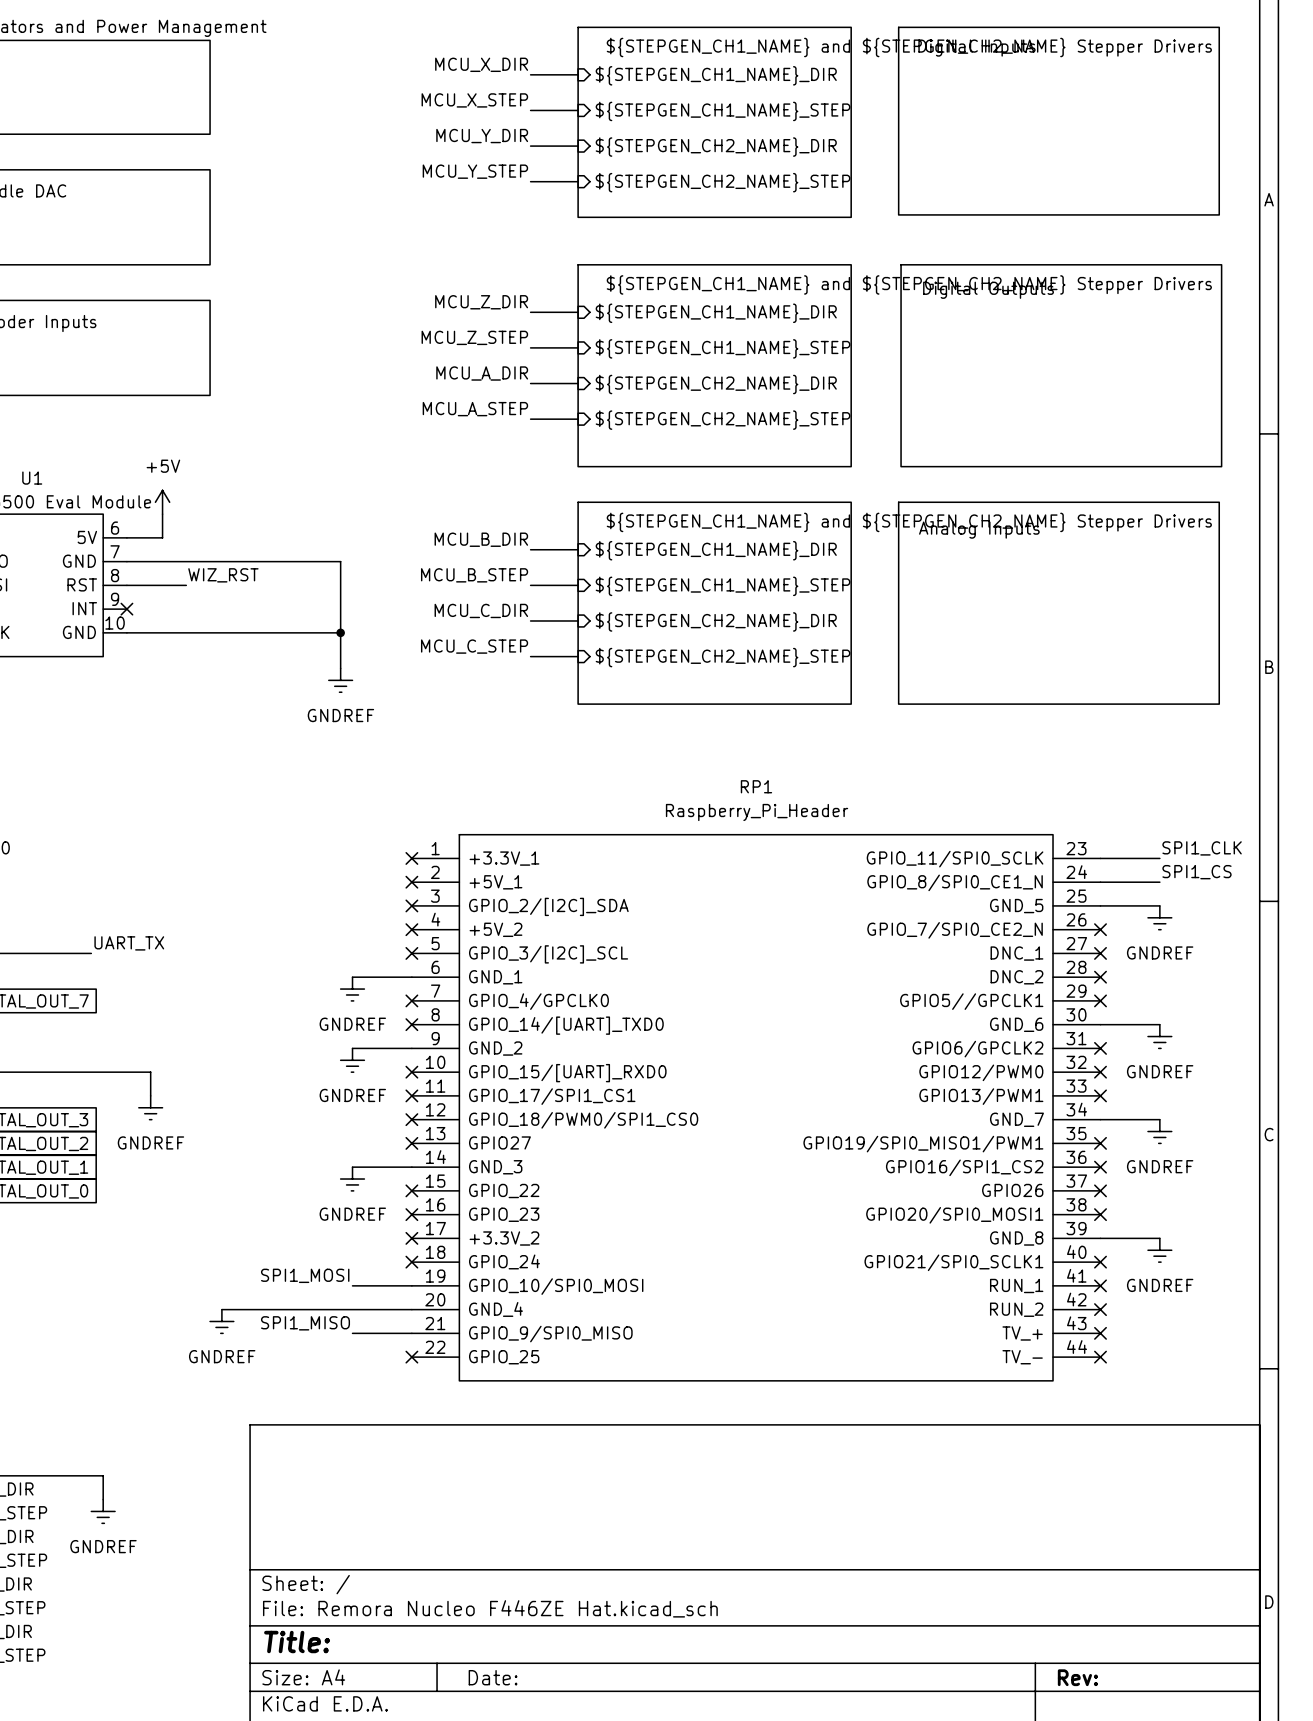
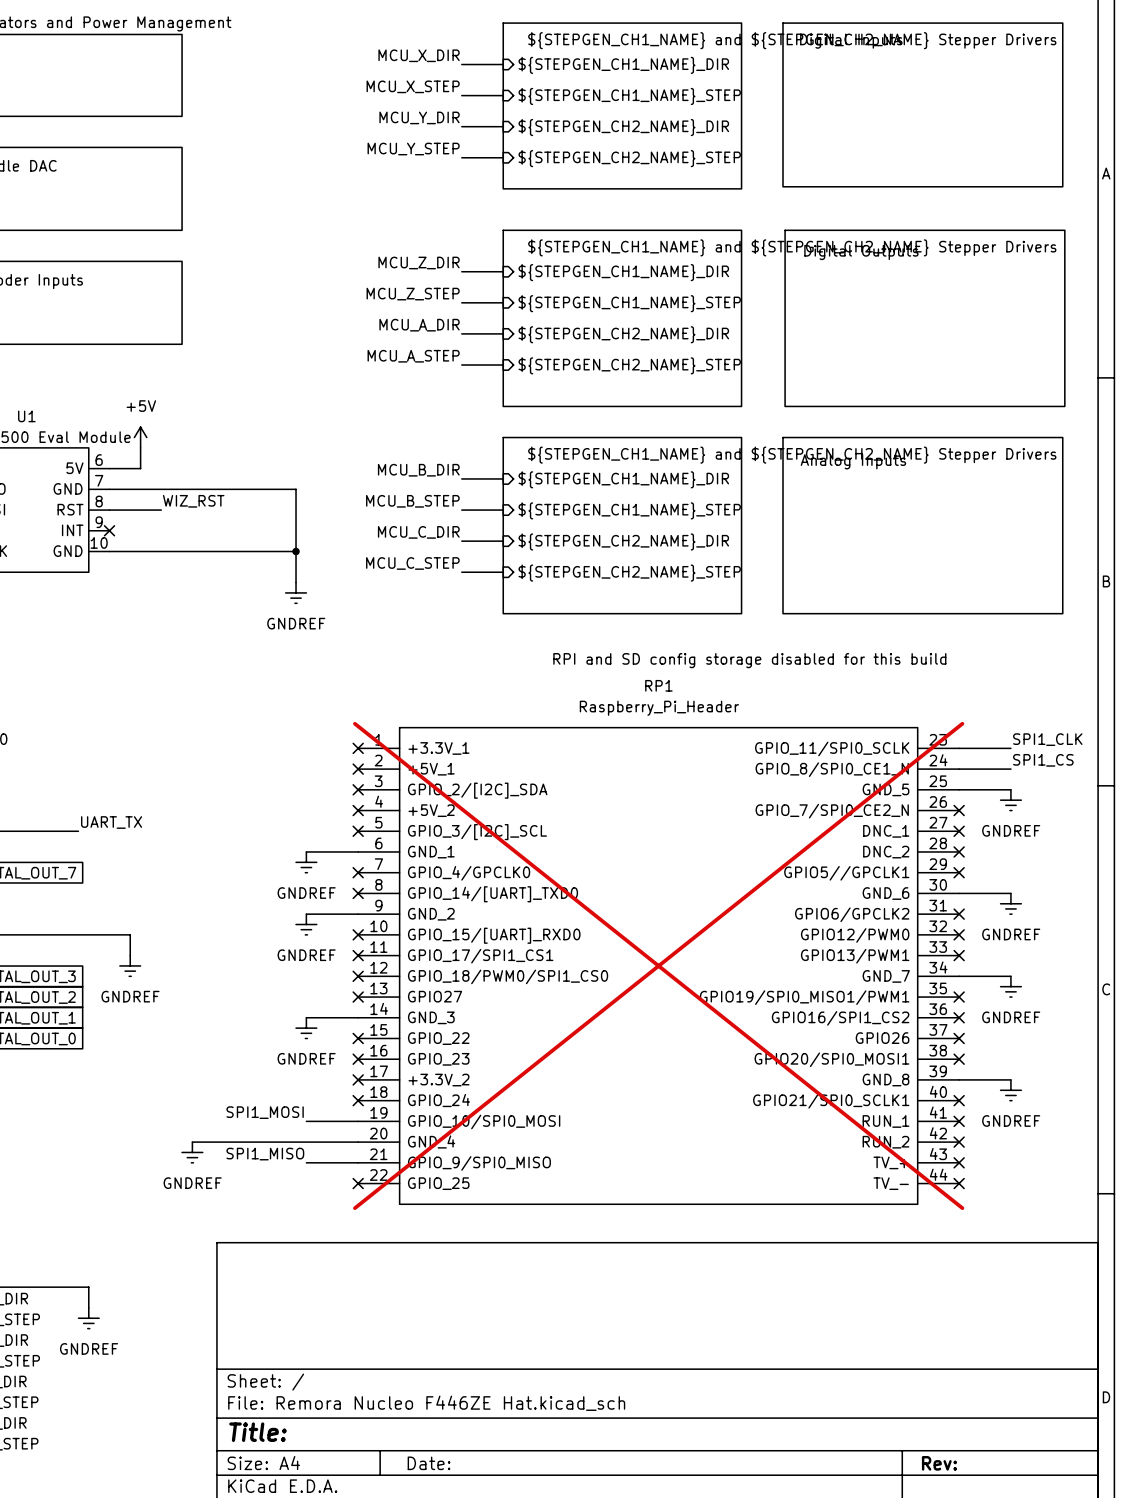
text: none -> RPI and SD config storage disabled for this build (749, 660)
RP1 do-not-place cross: none -> (658, 965)

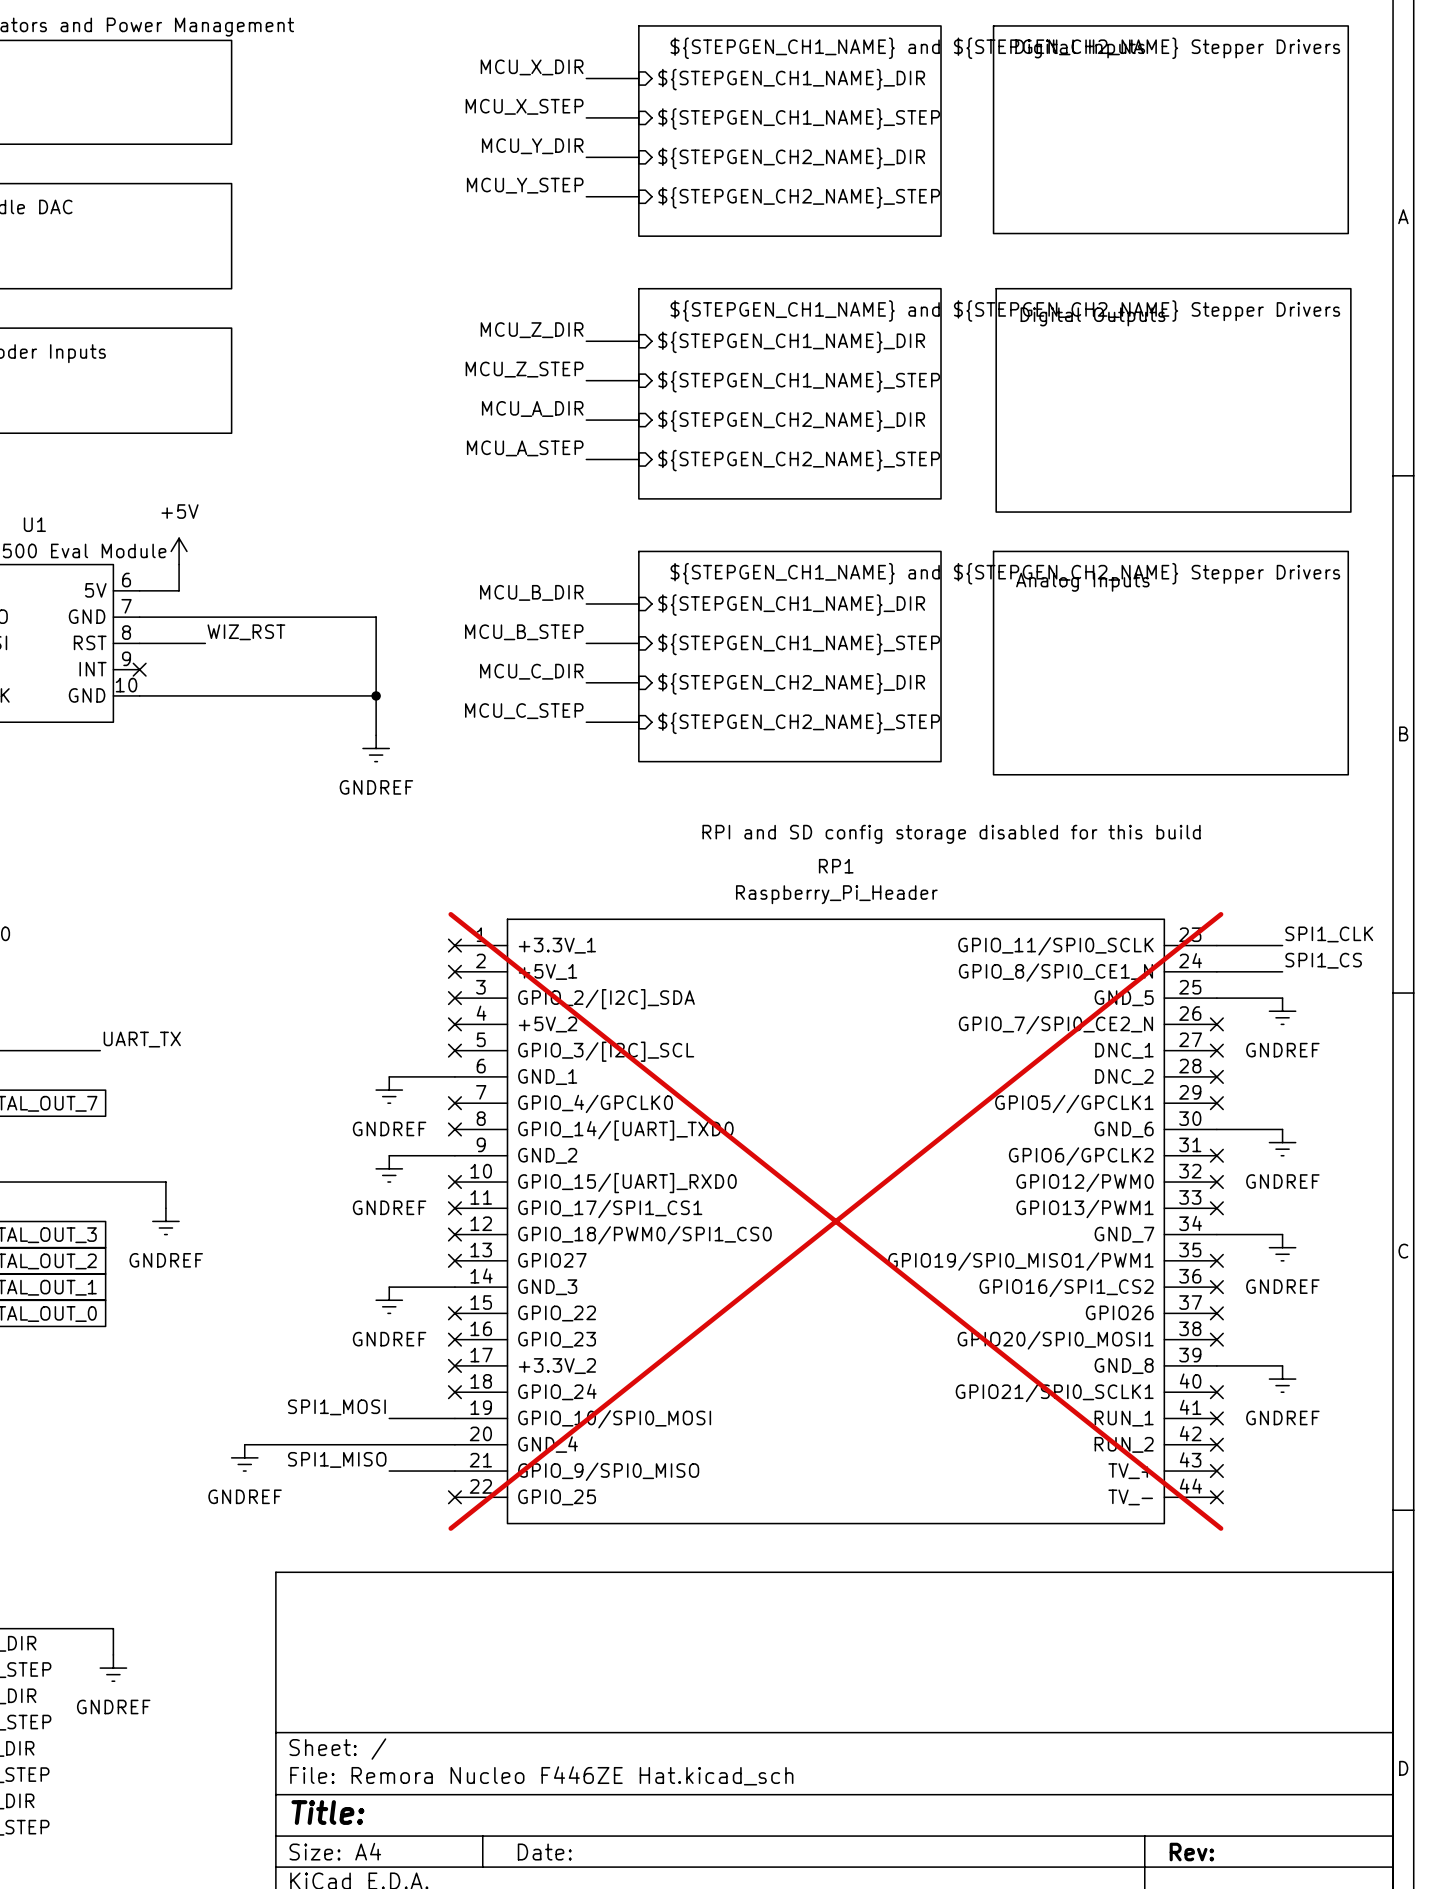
sheet ${STEPGEN_CH1_NAME} and ${STEPGEN_CH2_NAME} Stepper Drivers shape: [502, 229, 743, 408] -> [638, 287, 942, 500]
sheet ${STEPGEN_CH1_NAME} and ${STEPGEN_CH2_NAME} Stepper Drivers shape: [502, 436, 743, 615] -> [638, 550, 942, 763]

